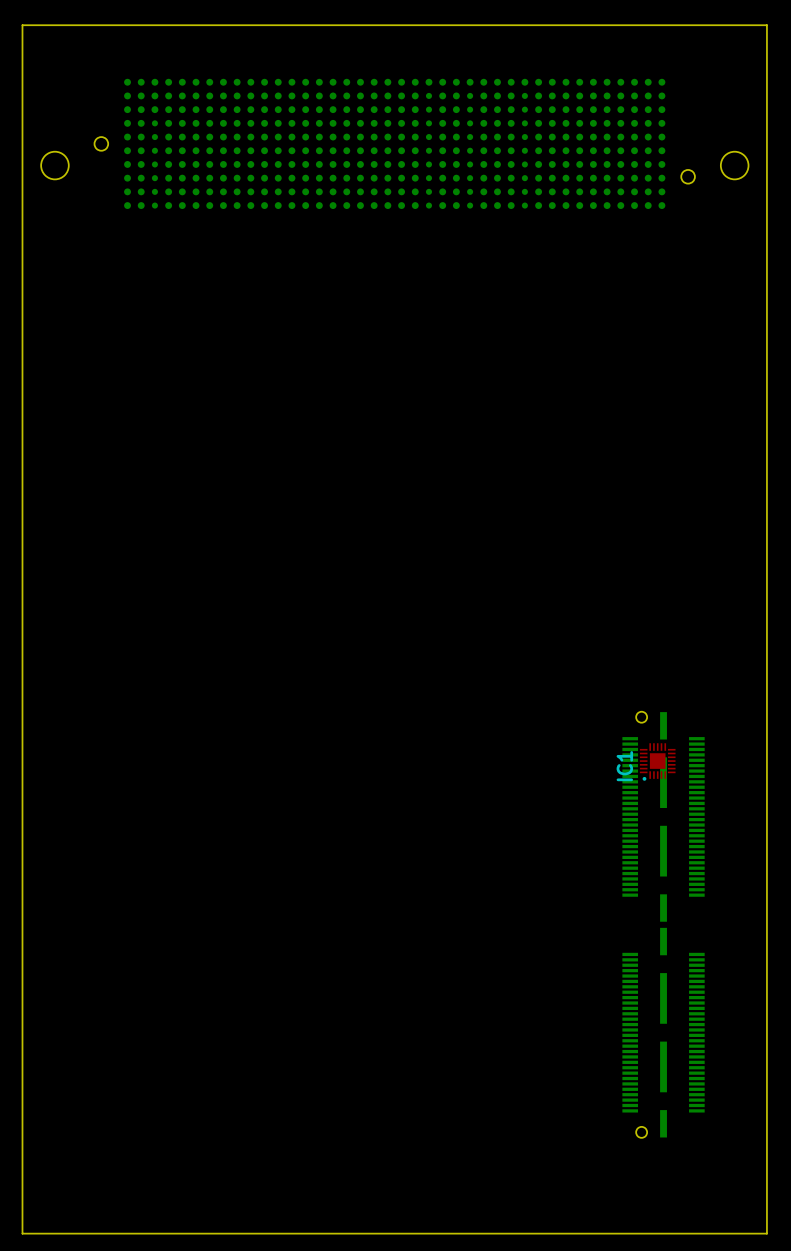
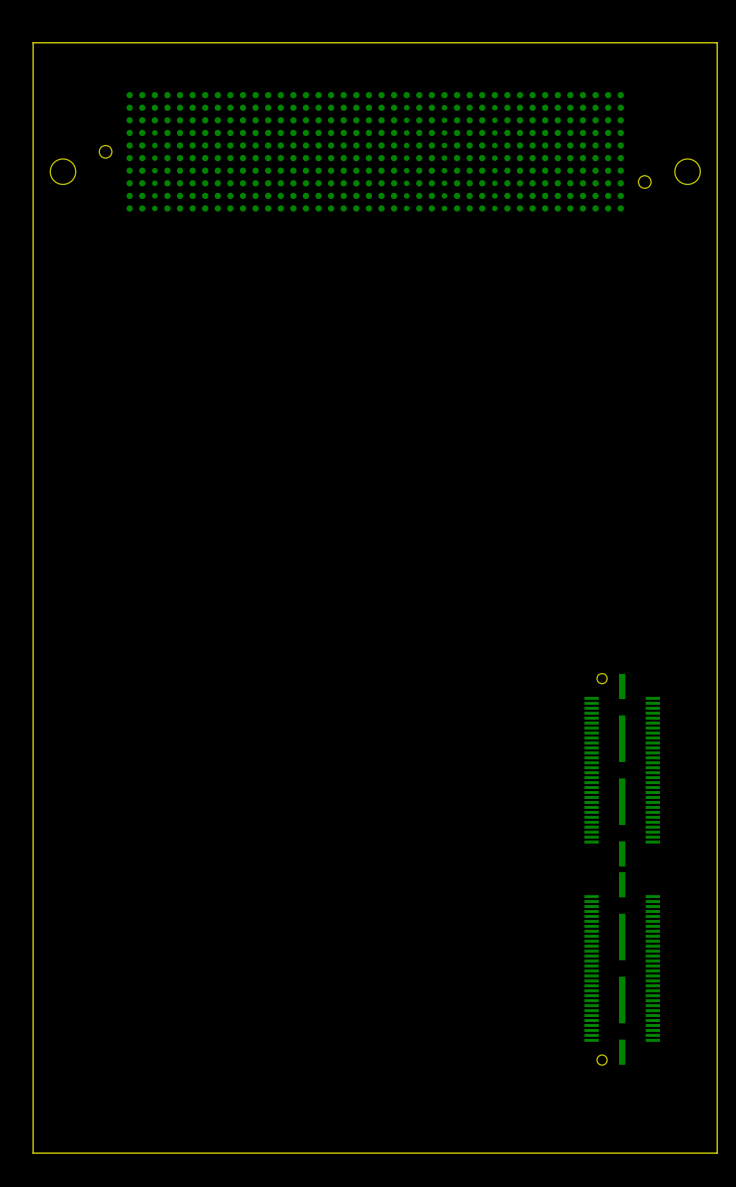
IC1: (657, 761) -> none

